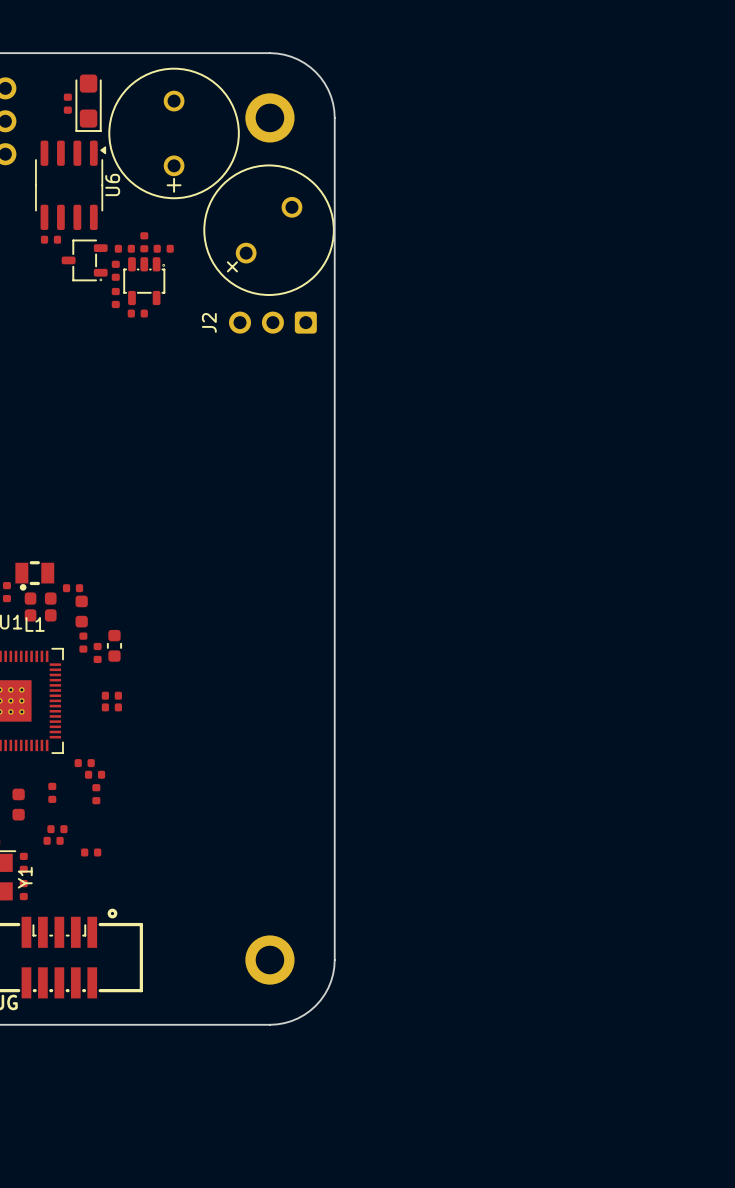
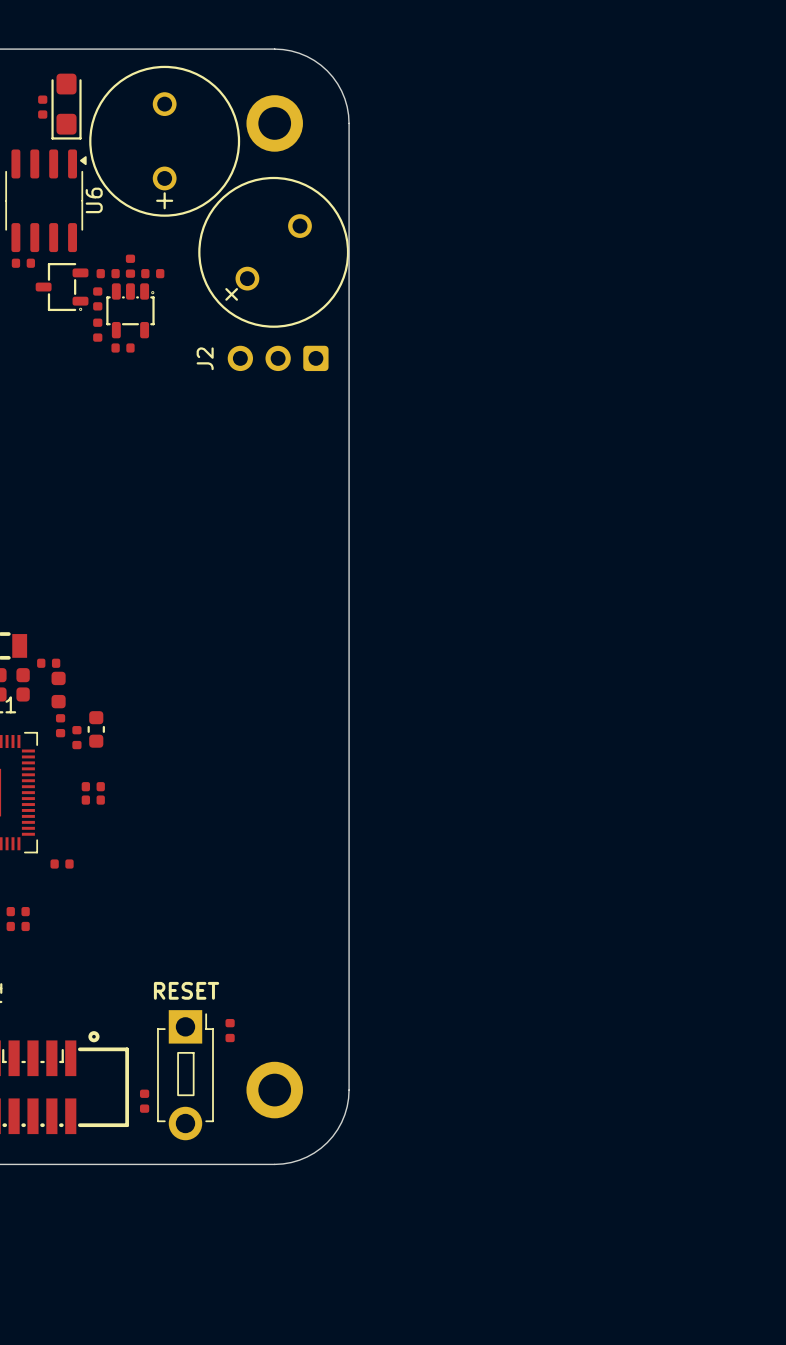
part: (95, 774) -> none
part: (52, 792) -> none
part: (96, 794) -> none
part: none -> (18, 911)
part: none -> (18, 926)
part: (57, 829) -> none
part: (53, 840) -> none
part: (91, 852) -> none
text: none -> RESET (186, 990)
part: none -> (230, 1030)
part: none -> (185, 1075)
part: none -> (144, 1101)

